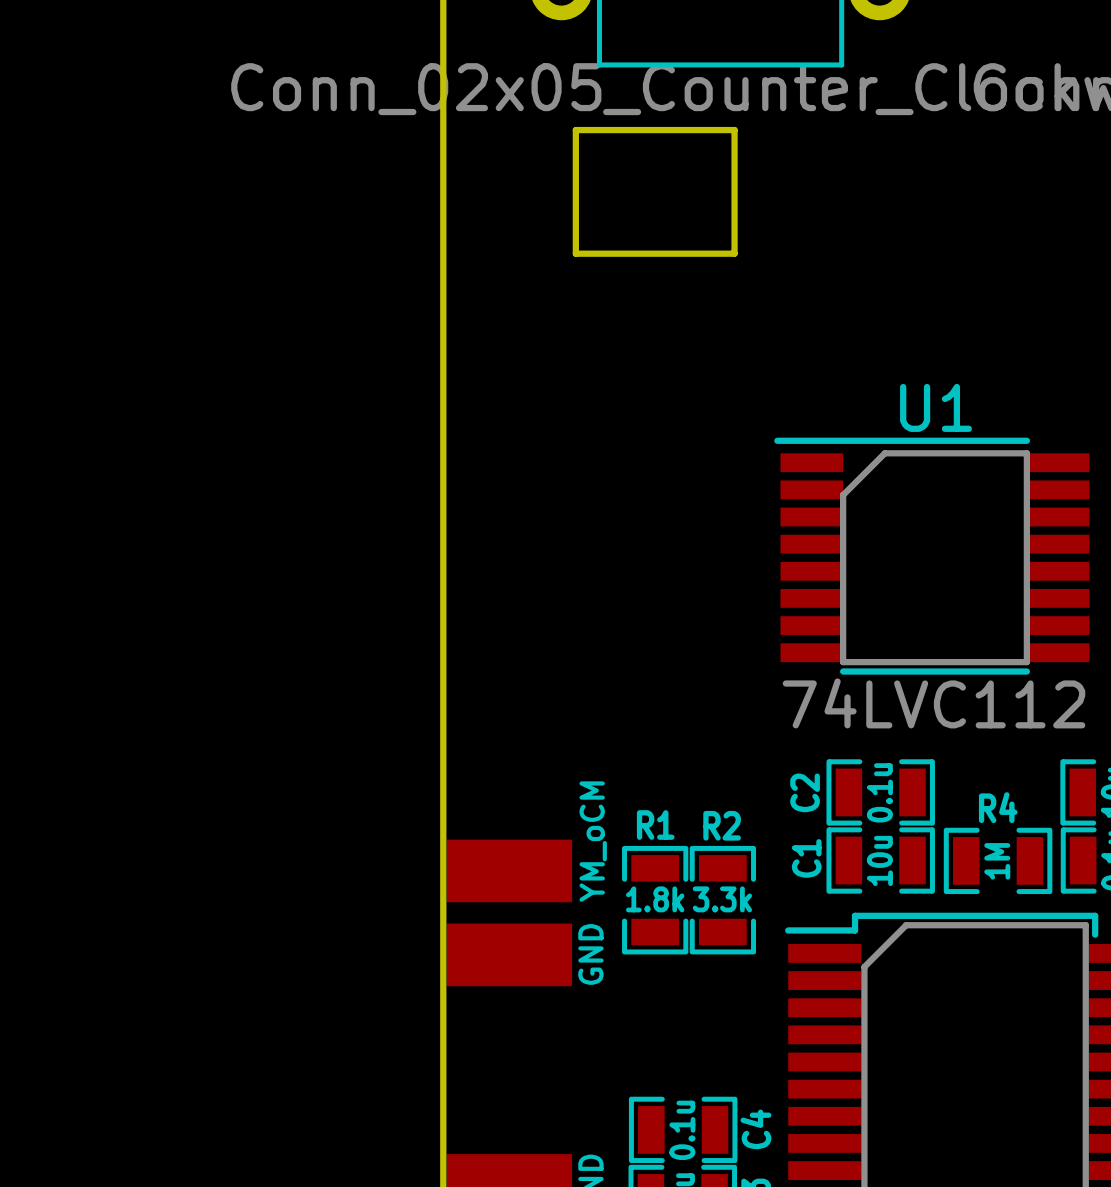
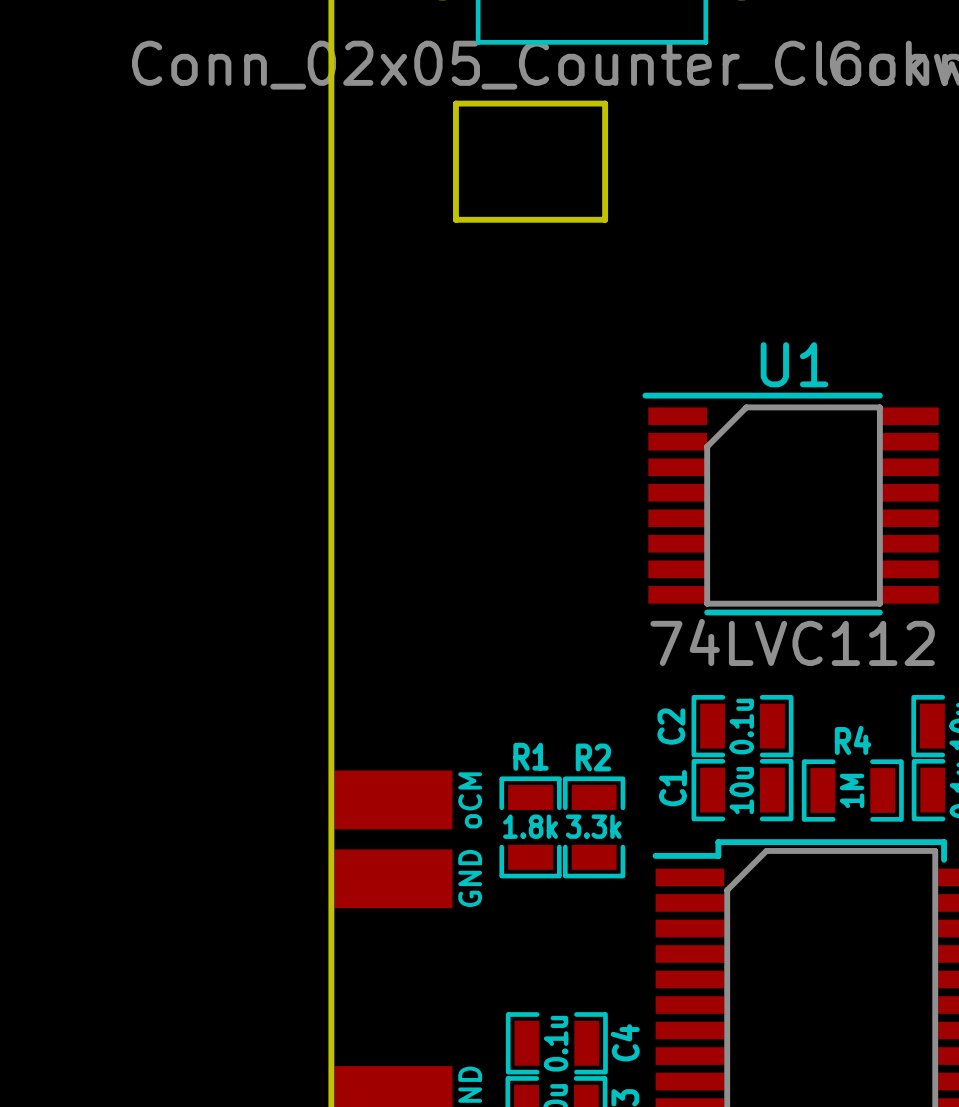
part value: YM_oCM (593, 841) -> oCM (470, 800)

